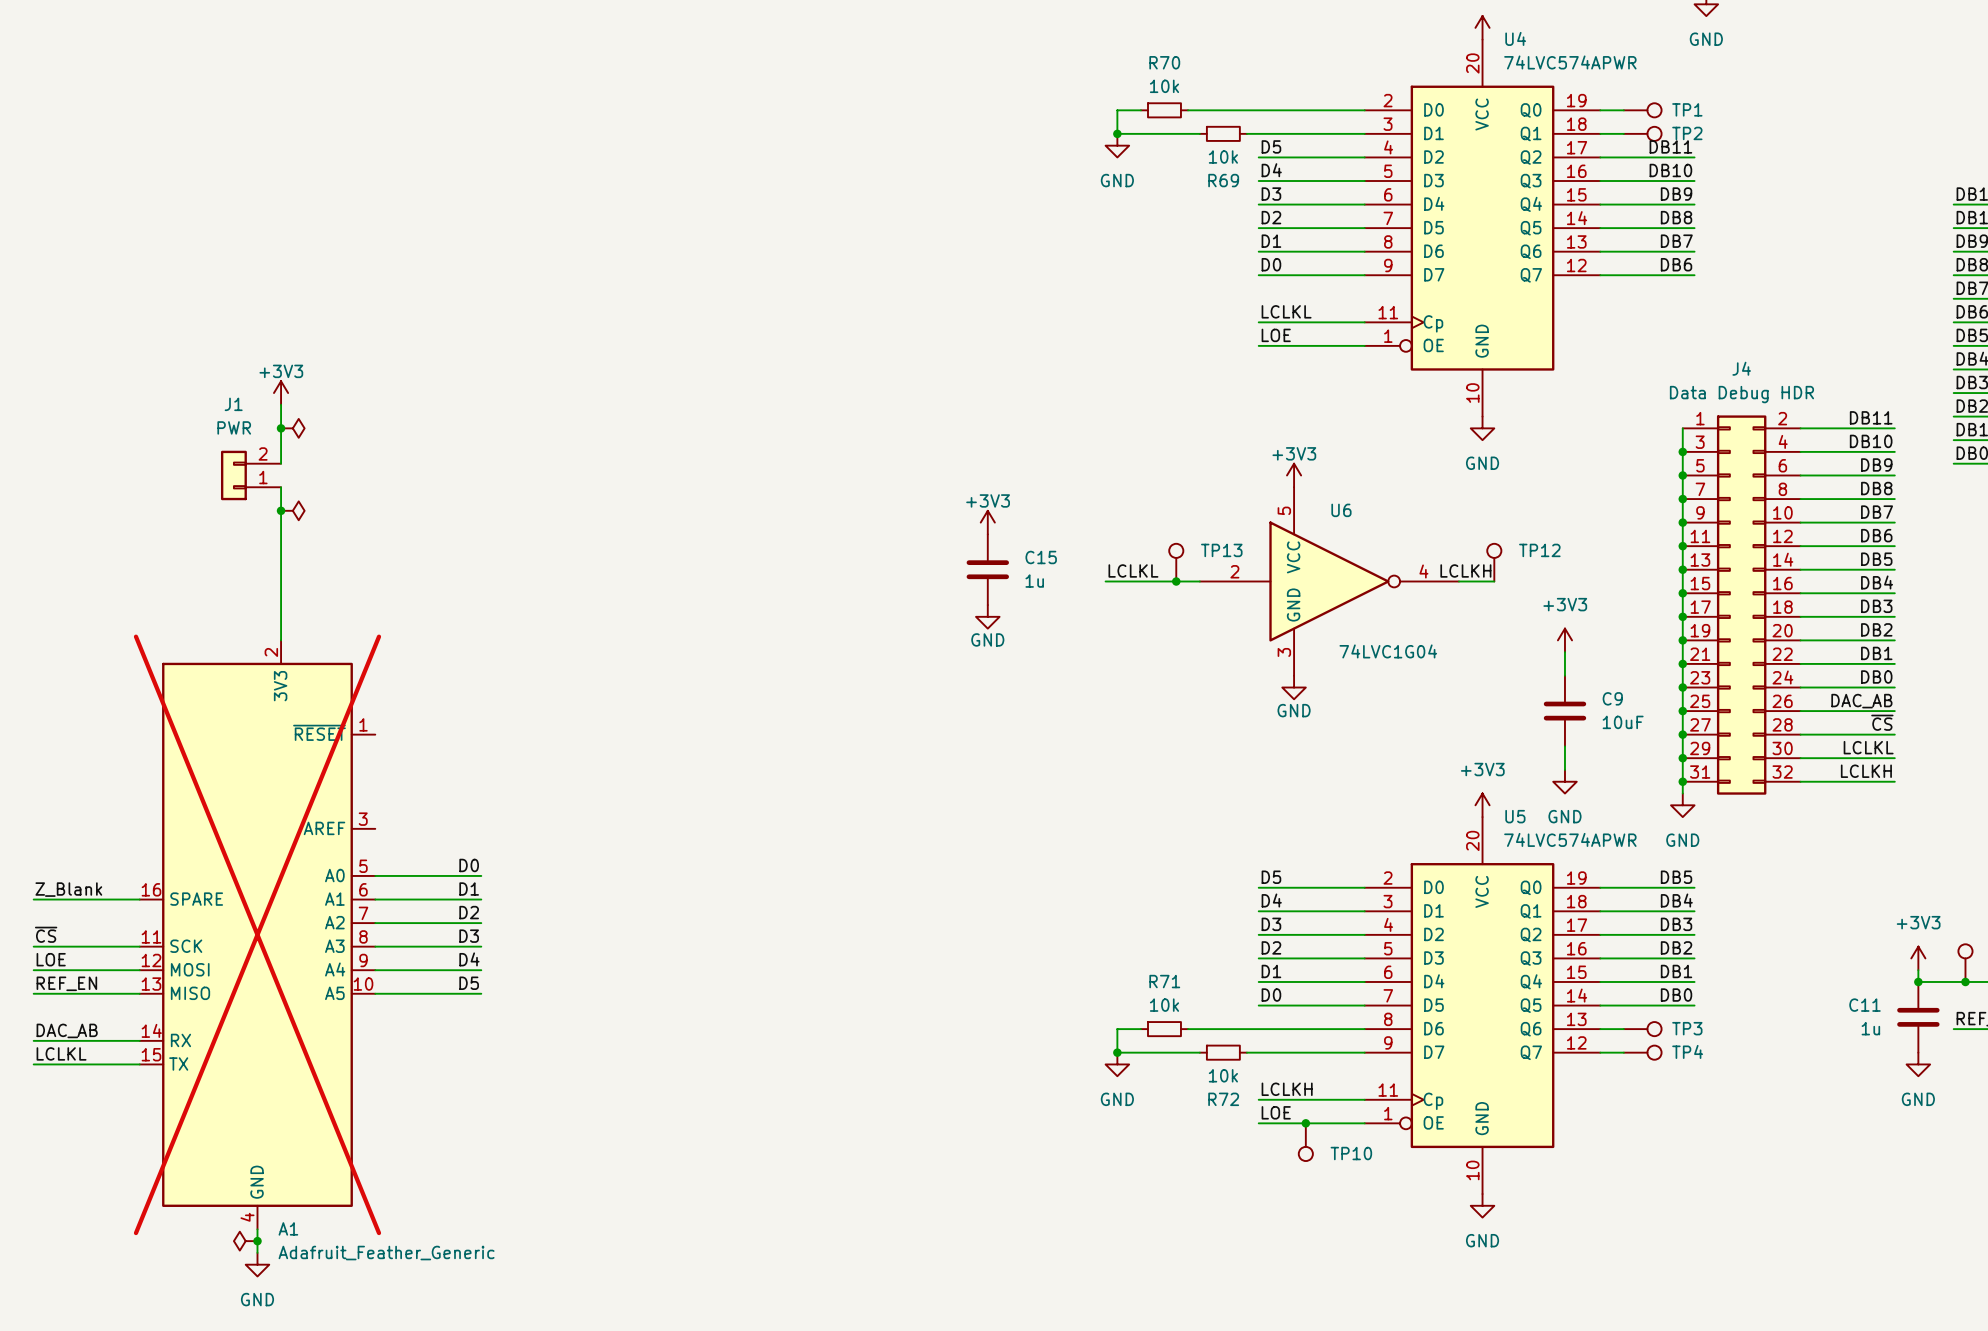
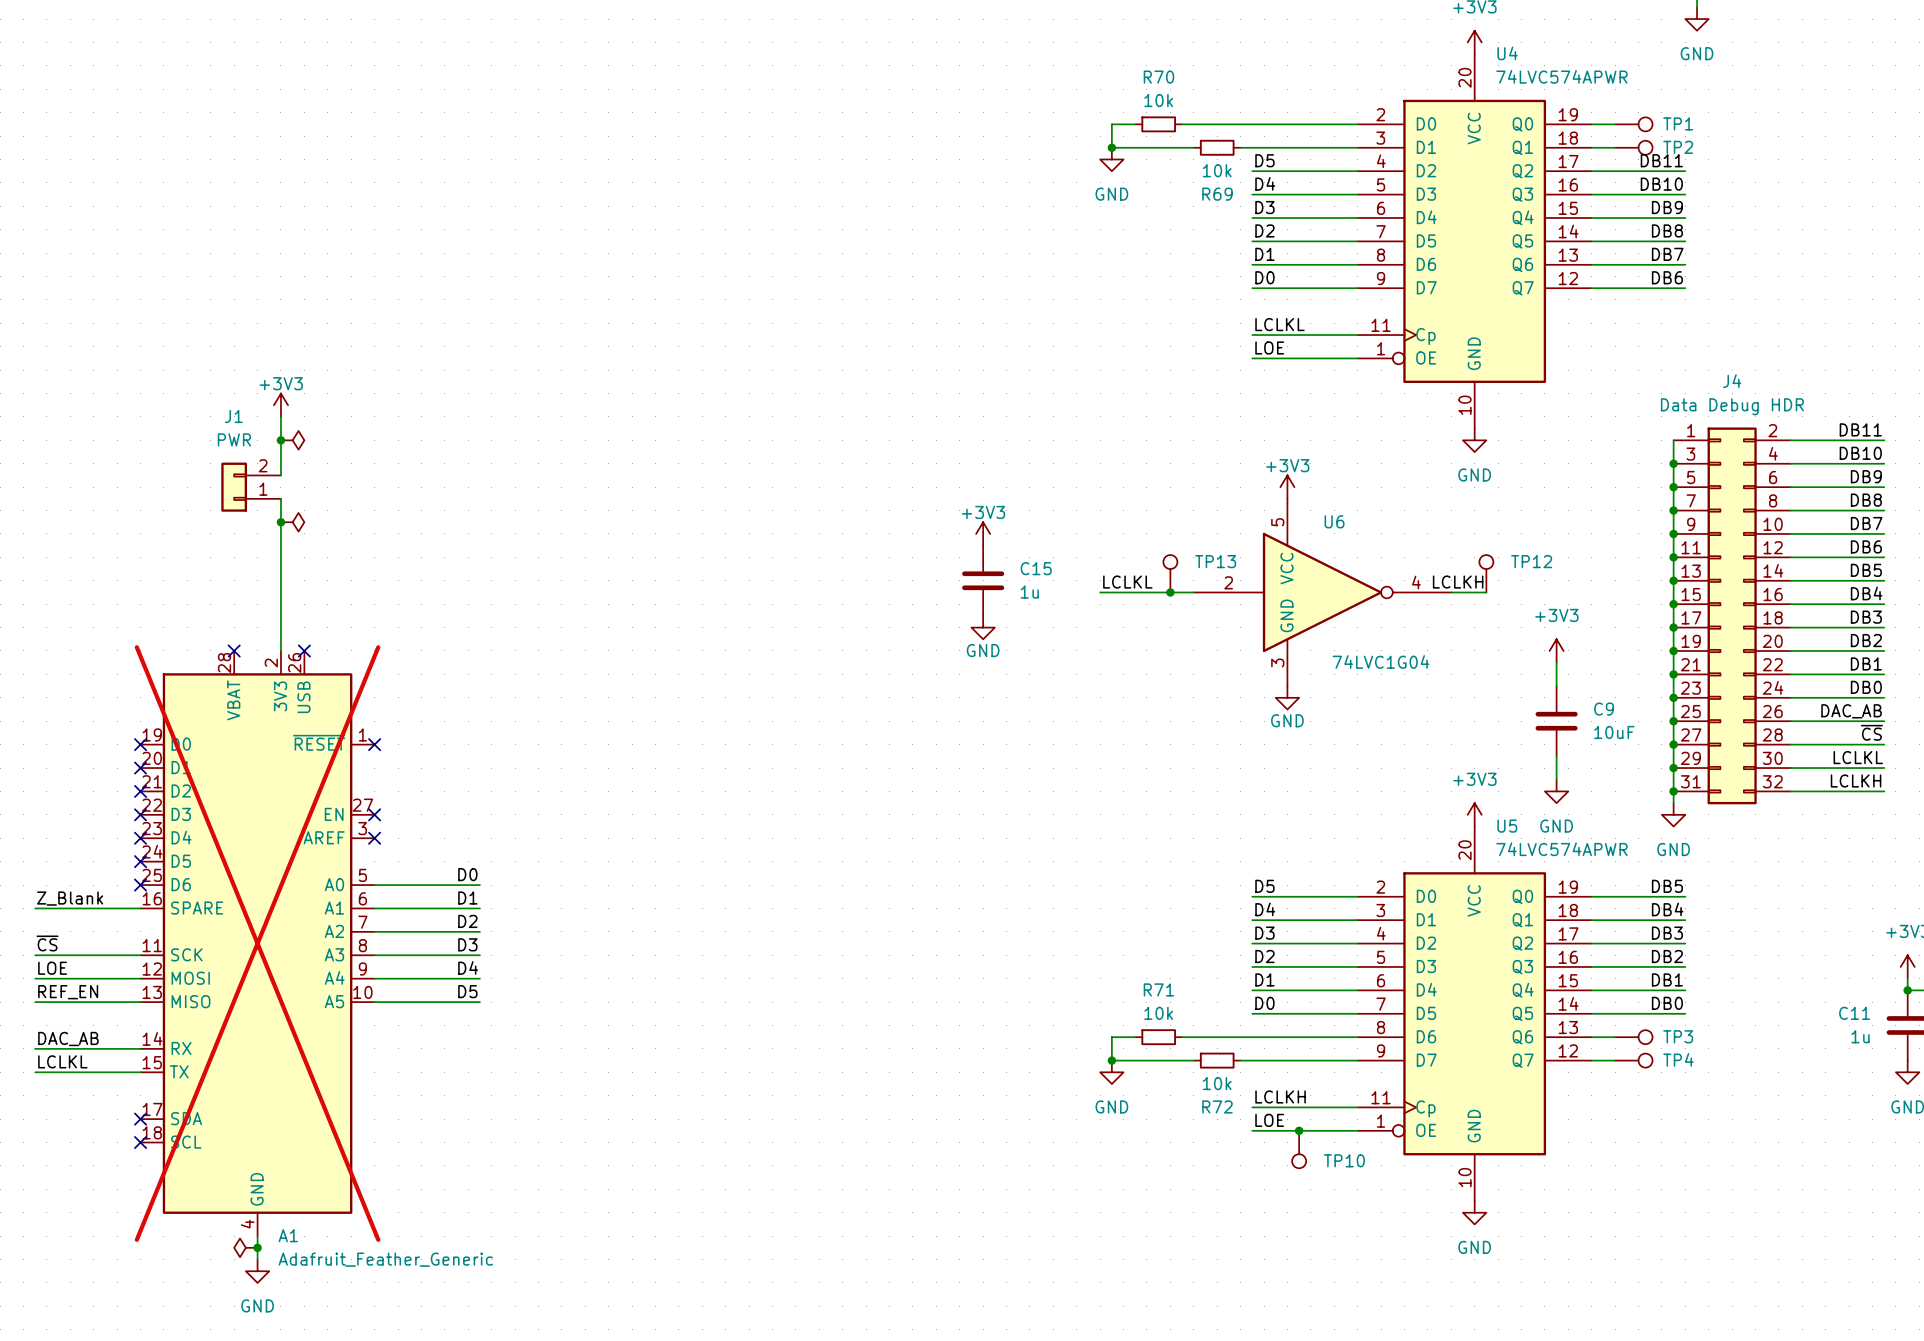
A1 symbol: [139, 640, 376, 1230] -> [140, 650, 375, 1237]
no-connect mark: none -> (234, 650)
no-connect mark: none -> (304, 650)
no-connect mark: none -> (140, 744)
no-connect mark: none -> (374, 744)
no-connect mark: none -> (140, 768)
no-connect mark: none -> (140, 791)
no-connect mark: none -> (140, 814)
no-connect mark: none -> (374, 814)
no-connect mark: none -> (140, 838)
no-connect mark: none -> (374, 838)
no-connect mark: none -> (140, 861)
no-connect mark: none -> (140, 885)
no-connect mark: none -> (140, 1119)
no-connect mark: none -> (140, 1142)

